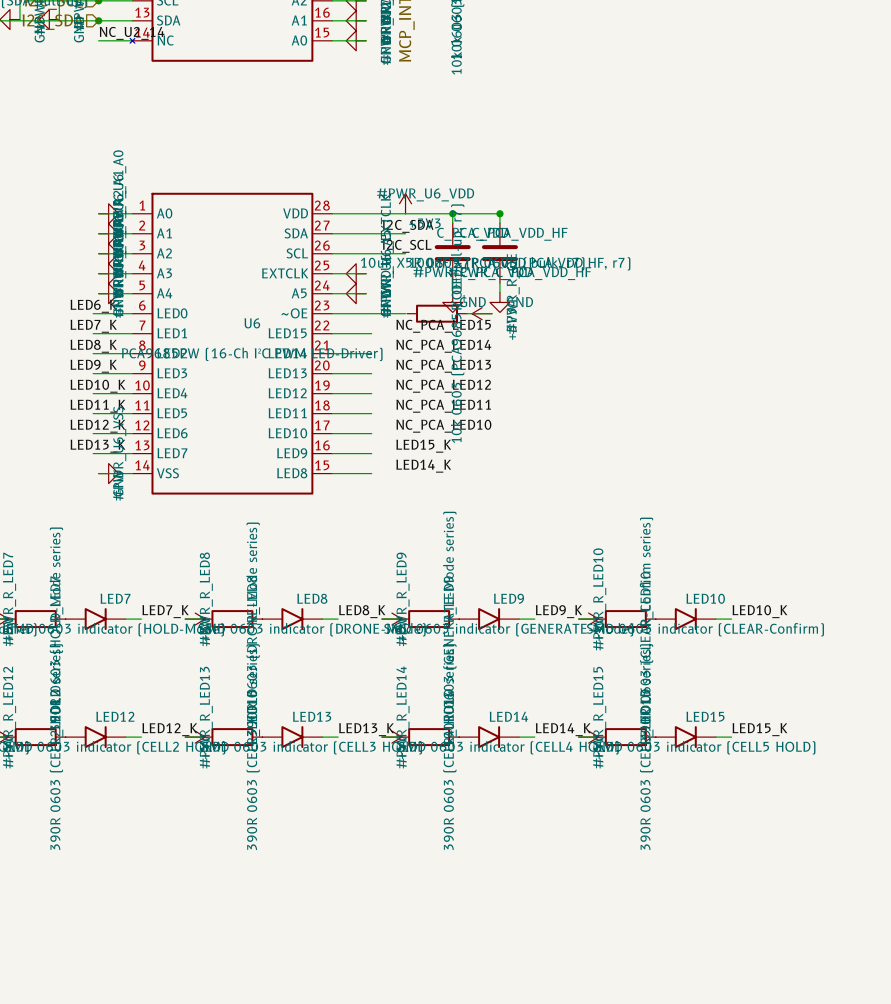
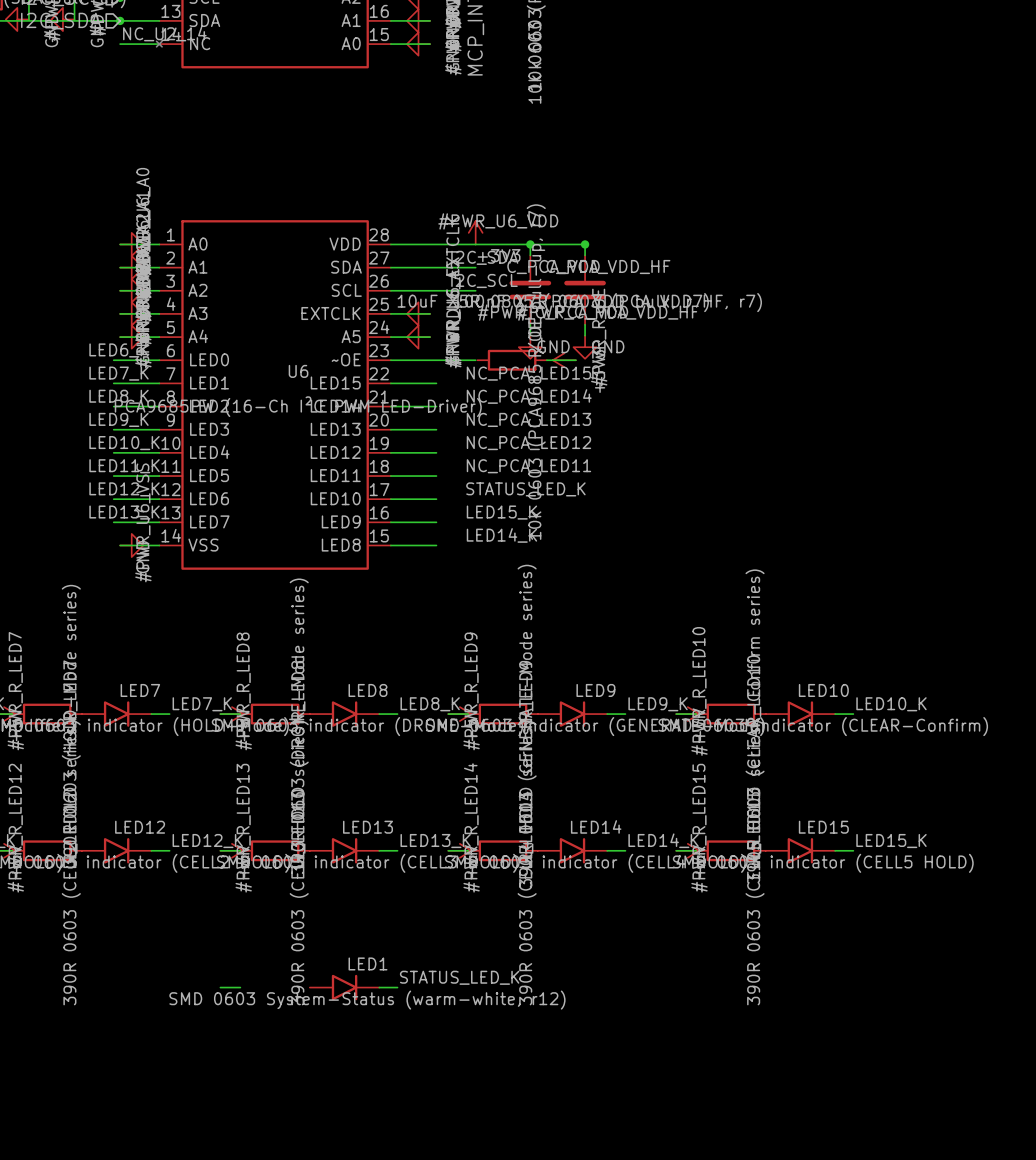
label: NC_PCA_LED10 (443, 426) -> STATUS_LED_K (525, 489)
label: none -> STATUS_LED_K (459, 977)
wire: none -> (220, 987) (240, 987)
LED1: none -> SMD 0603 System-Status (warm-white, r12) (344, 987)
wire: none -> (379, 987) (397, 987)

